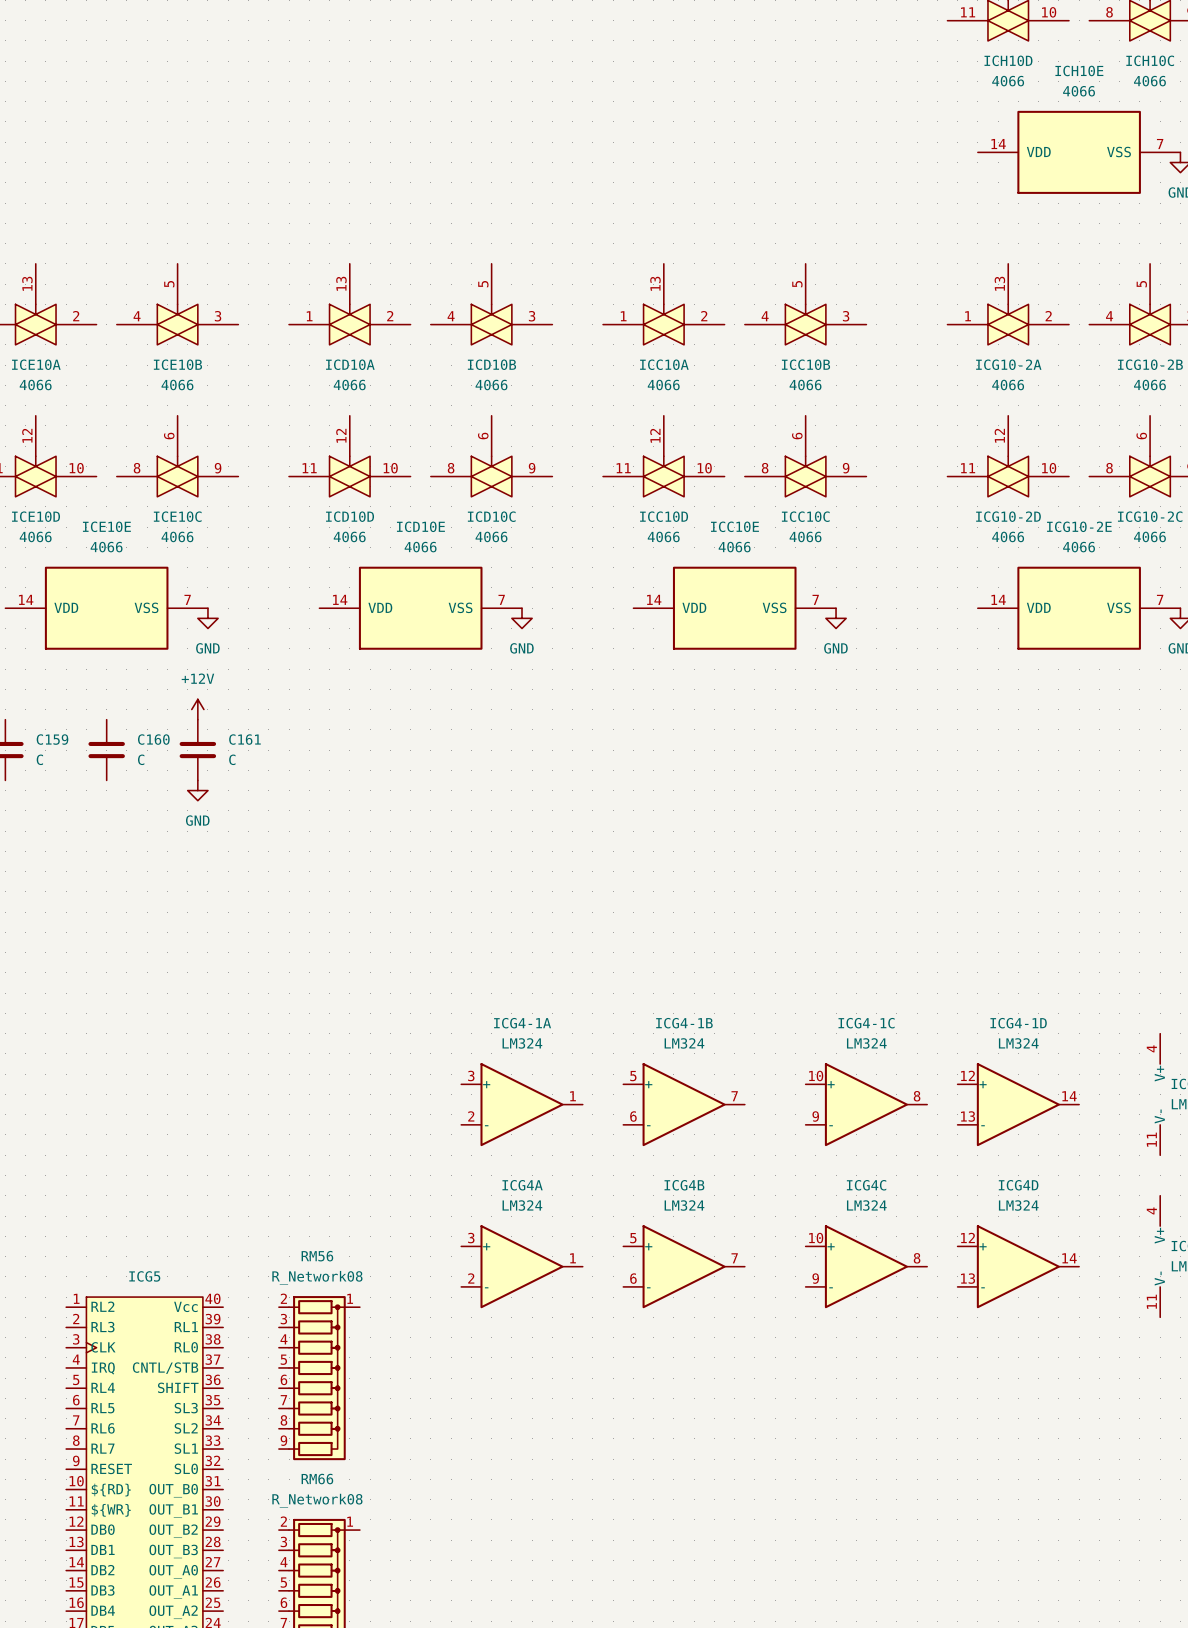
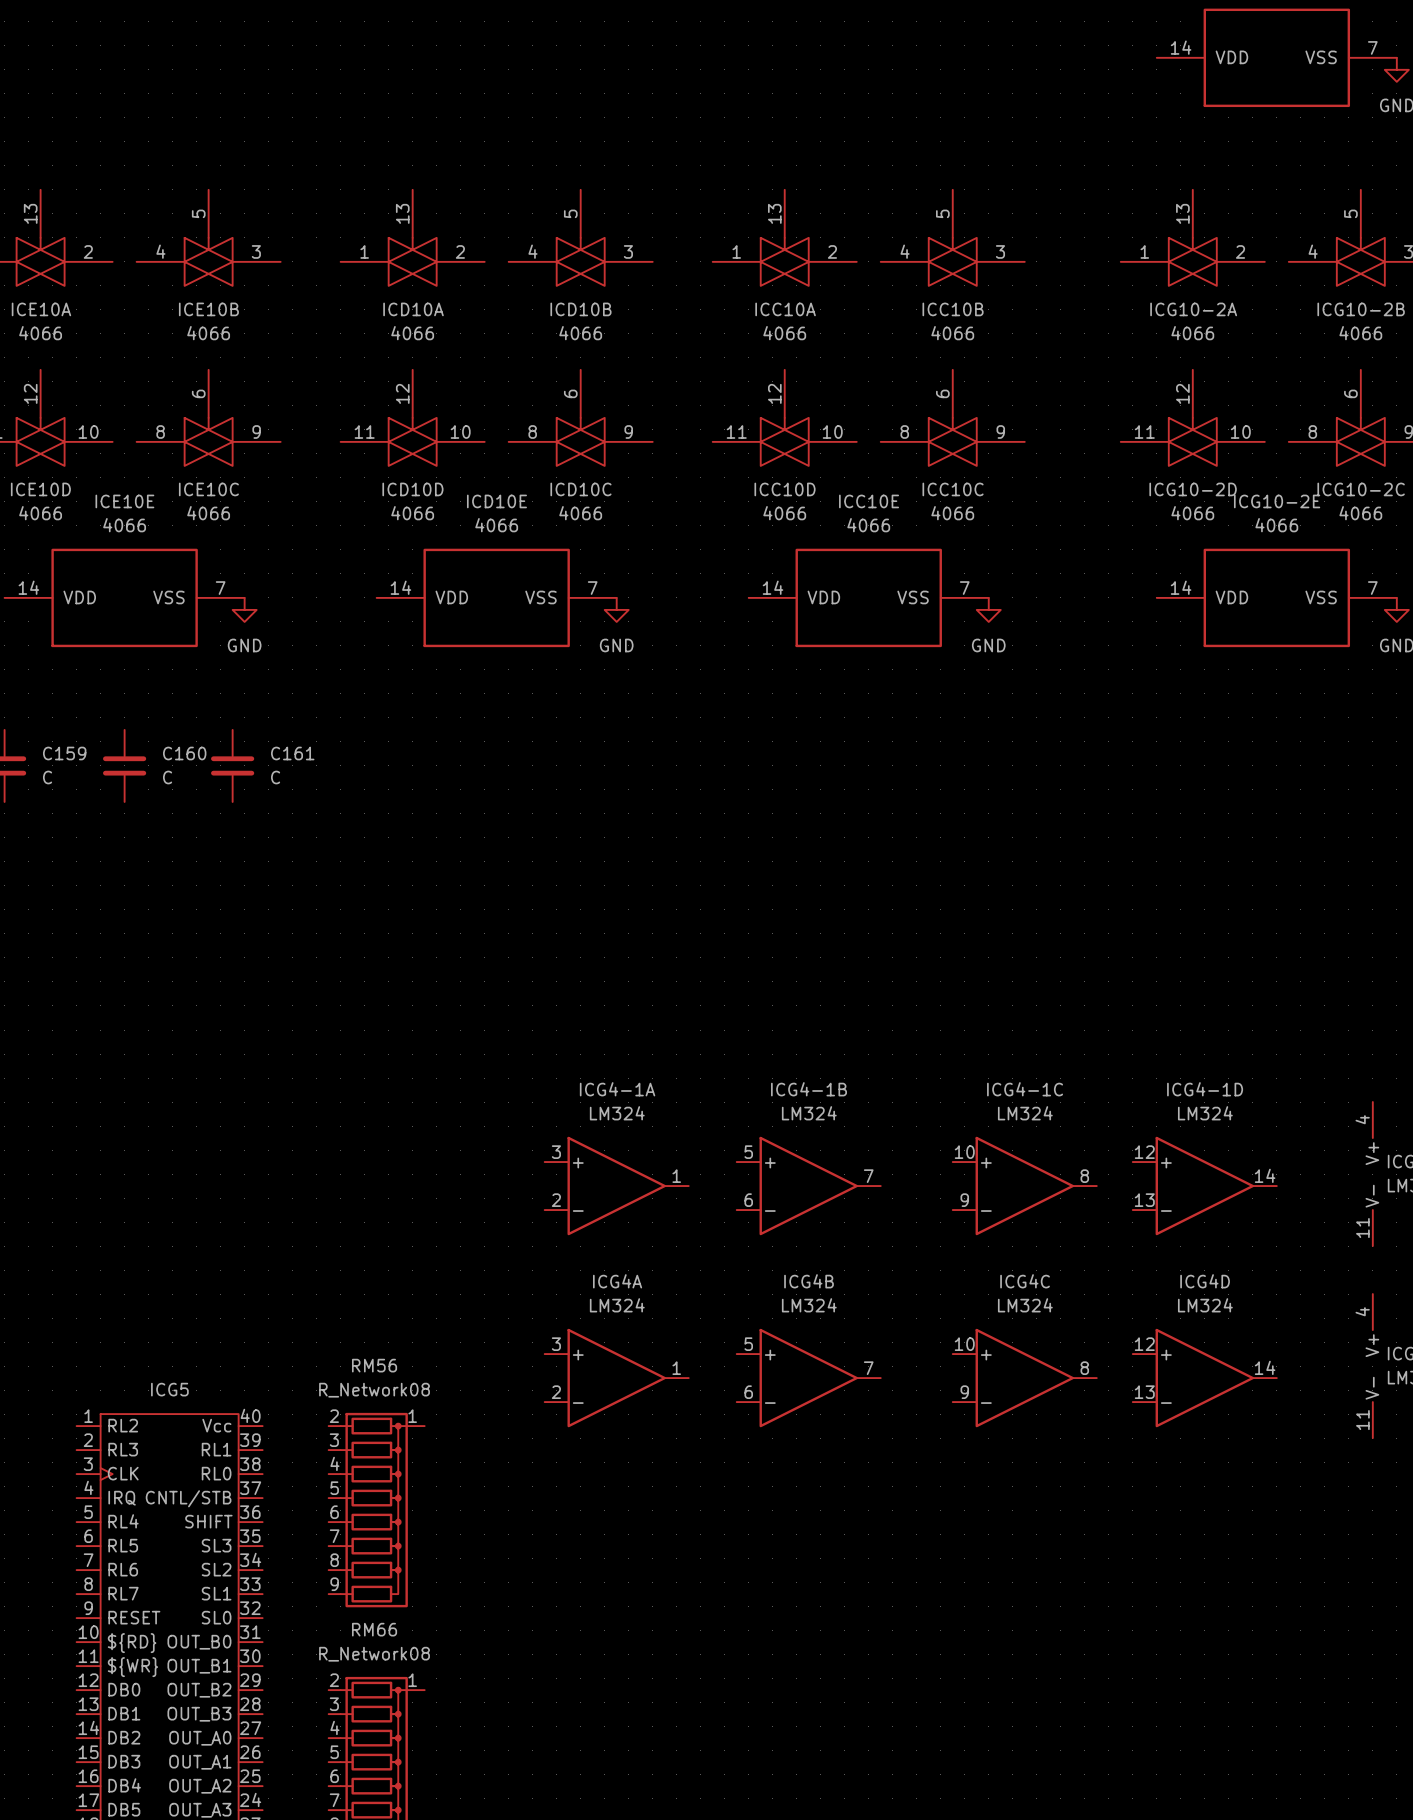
power symbol: +12V (197, 709) -> none
power symbol: GND (197, 790) -> none

